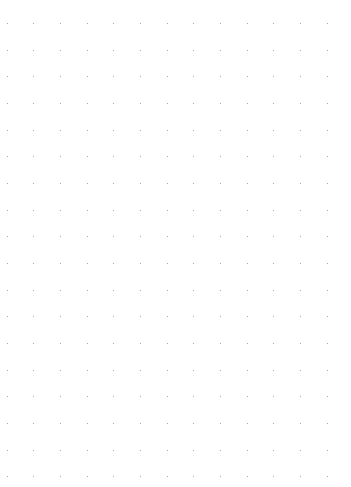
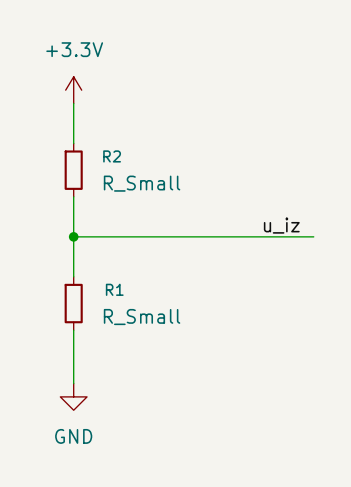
power symbol: none -> +3.3V (73, 90)
wire: none -> (73, 103) (73, 143)
R2: none -> R_Small (73, 170)
wire: none -> (73, 196) (73, 276)
label: none -> u_iz (281, 225)
wire: none -> (73, 236) (313, 236)
junction: none -> (73, 236)
R1: none -> R_Small (73, 303)
wire: none -> (73, 330) (73, 383)
power symbol: none -> GND (73, 396)

